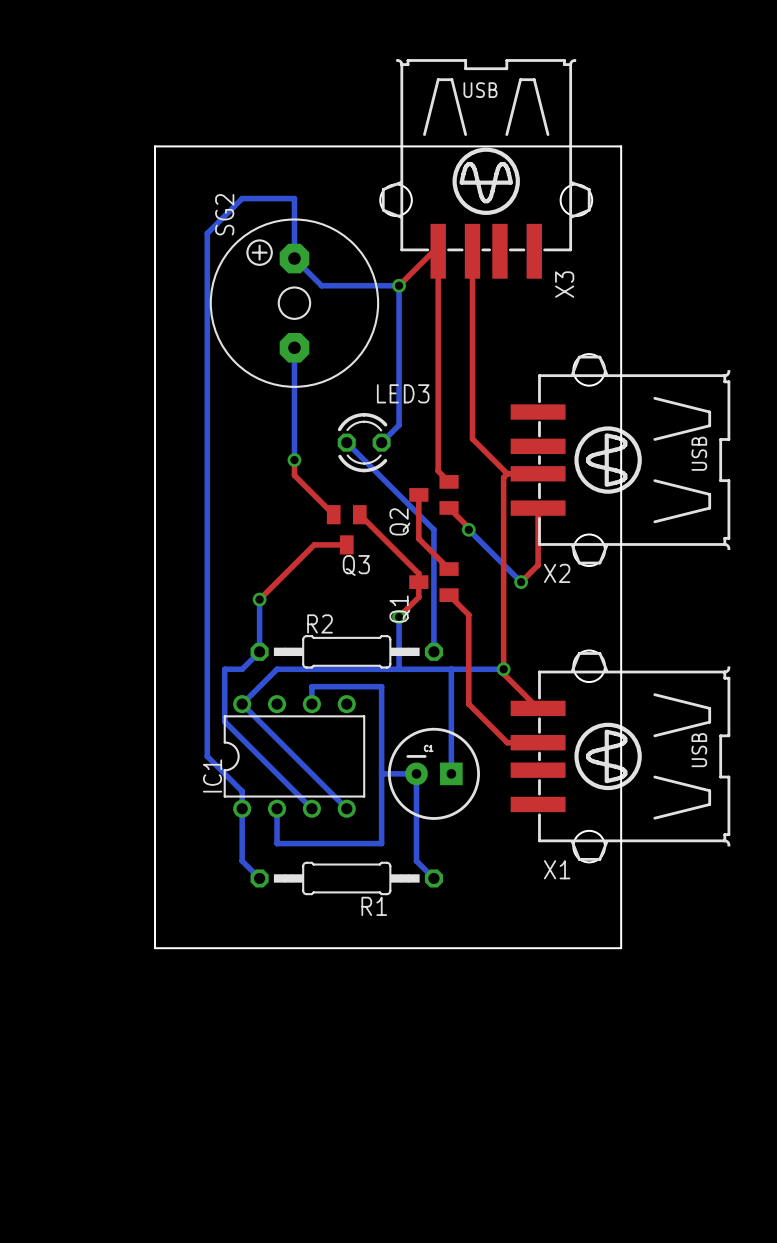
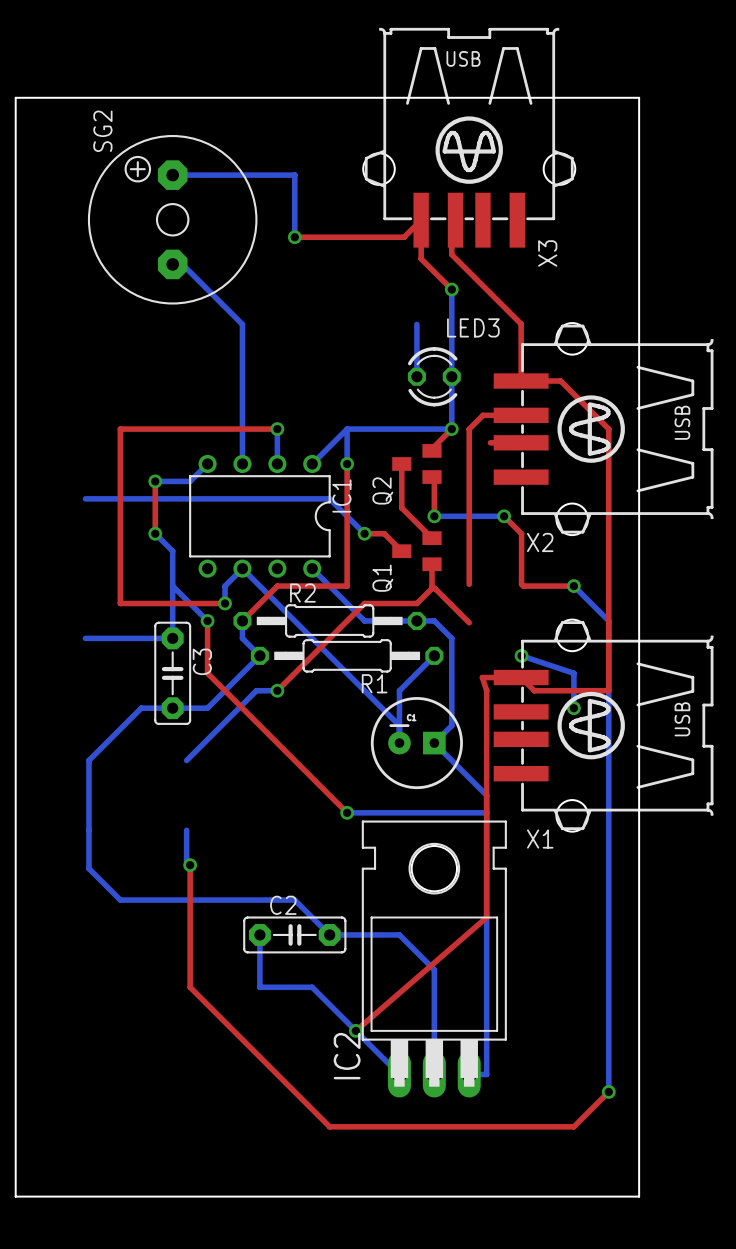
board edge: (155, 146) (621, 146) (621, 948) (155, 948) (155, 146) -> (15, 97) (15, 1196) (639, 1196) (639, 97) (15, 97)
bottom track: none -> (172, 175) (294, 175) (294, 237)
top track: (438, 251) (433, 251) (399, 285) -> (421, 220) (404, 237) (294, 237)
top track: none -> (455, 220) (451, 223) (451, 254) (521, 324) (521, 381) (560, 381) (608, 429) (608, 690) (534, 690) (521, 677) (482, 677) (486, 690) (486, 917) (355, 1030)
top track: (476, 254) (472, 251) (472, 438) (507, 473) (503, 477) (503, 673) (538, 708) -> none
via: none -> (294, 237)
via: (399, 285) -> none
top track: (438, 289) (438, 471) (449, 481) -> (421, 258) (451, 289)
bottom track: none -> (172, 264) (182, 264) (242, 324) (242, 463)
SG2 position: (294, 303) -> (172, 219)
bottom track: none -> (451, 289) (451, 429) (347, 429)
via: none -> (451, 289)
bottom track: (294, 347) (294, 460) -> (277, 463) (277, 429)
bottom track: (346, 442) (433, 529) (433, 651) -> none
LED3 position: (364, 442) -> (434, 376)
bottom track: (381, 442) (399, 425) (399, 285) (321, 285) (294, 258) (294, 198) (242, 198) (207, 233) (207, 756) (242, 791) (242, 861) (259, 878) -> none
top track: none -> (521, 415) (482, 415) (469, 429) (469, 584)
top track: (294, 460) (294, 475) (333, 514) -> (277, 429) (120, 429) (120, 603) (225, 603)
bottom track: none -> (347, 429) (312, 463)
bottom track: none -> (347, 429) (347, 463)
top track: none -> (451, 429) (432, 450)
via: none -> (451, 429)
bottom track: none -> (207, 463) (190, 481) (155, 481)
top track: none -> (347, 463) (347, 586) (277, 586) (242, 620)
via: none -> (347, 463)
top track: (538, 508) (538, 565) (521, 582) -> none
top track: (451, 510) (468, 529) -> (434, 479) (434, 516)
top track: none -> (155, 481) (155, 533)
via: none -> (155, 481)
top track: (359, 514) (418, 573) (418, 597) (399, 616) -> none
bottom track: none -> (85, 498) (329, 498) (364, 533)
Q3: (346, 529) -> none
bottom track: (468, 529) (521, 582) -> none
via position: (468, 529) -> (434, 516)
top track: (346, 544) (314, 544) (259, 599) -> none
bottom track: none -> (434, 516) (504, 516)
top track: none -> (504, 516) (521, 533) (521, 584) (523, 586) (573, 586)
via: none -> (504, 516)
bottom track: none -> (155, 533) (172, 551) (172, 638) (85, 638)
via: none -> (155, 533)
top track: none -> (364, 533) (384, 533) (401, 551)
via: none -> (364, 533)
via: (521, 582) -> none
top track: (449, 595) (468, 614) (468, 704) (507, 742) (538, 742) -> (432, 564) (432, 588)
bottom track: (259, 599) (259, 651) (242, 669) (224, 669) (224, 721) (311, 808) -> none
via: (259, 599) -> none
bottom track: none -> (312, 568) (364, 620) (434, 620) (451, 638) (451, 725) (434, 743) (486, 795) (486, 1074) (469, 1074)
bottom track: none -> (172, 586) (207, 620)
bottom track: (399, 616) (399, 669) -> (416, 324) (416, 376)
via: (399, 616) -> none
bottom track: none -> (573, 586) (608, 620) (608, 1091)
via: none -> (573, 586)
top track: none -> (432, 588) (416, 603) (364, 603) (277, 690)
top track: none -> (432, 588) (434, 588) (469, 622)
bottom track: none -> (225, 603) (225, 586) (242, 568) (399, 725)
via: none -> (225, 603)
top track: none -> (207, 620) (207, 673) (347, 812)
via: none -> (207, 620)
bottom track: none -> (242, 620) (242, 638) (259, 655) (207, 708) (141, 708) (88, 760) (88, 868) (120, 900) (294, 900) (329, 934) (399, 934) (434, 969) (434, 1074)
bottom track: (451, 669) (451, 773) -> none
bottom track: (503, 669) (277, 669) (242, 704) (346, 808) -> none
via position: (503, 669) -> (521, 655)
bottom track: none -> (434, 655) (399, 690) (399, 743)
bottom track: none -> (521, 655) (573, 673) (573, 708)
C3: none -> (172, 673)
bottom track: (311, 704) (311, 686) (381, 686) (381, 843) -> (486, 812) (364, 812)
bottom track: none -> (277, 690) (256, 690) (186, 760)
via: none -> (277, 690)
via: none -> (573, 708)
IC1 rotation: 0° (294, 756) -> 180° (259, 516)
IC1 position: (294, 756) -> (259, 516)
bottom track: (381, 773) (416, 773) (416, 861) (433, 878) -> none
bottom track: (277, 808) (277, 843) (364, 843) -> none
via: none -> (347, 812)
bottom track: none -> (186, 830) (186, 861) (190, 865)
R1 position: (346, 878) -> (347, 655)
top track: none -> (190, 865) (190, 987) (329, 1126) (573, 1126) (608, 1091)
via: none -> (190, 865)
bottom track: none -> (259, 934) (259, 987) (312, 987) (399, 1074)
C2: none -> (294, 934)
IC2: none -> (434, 959)
via: none -> (355, 1030)
via: none -> (608, 1091)

